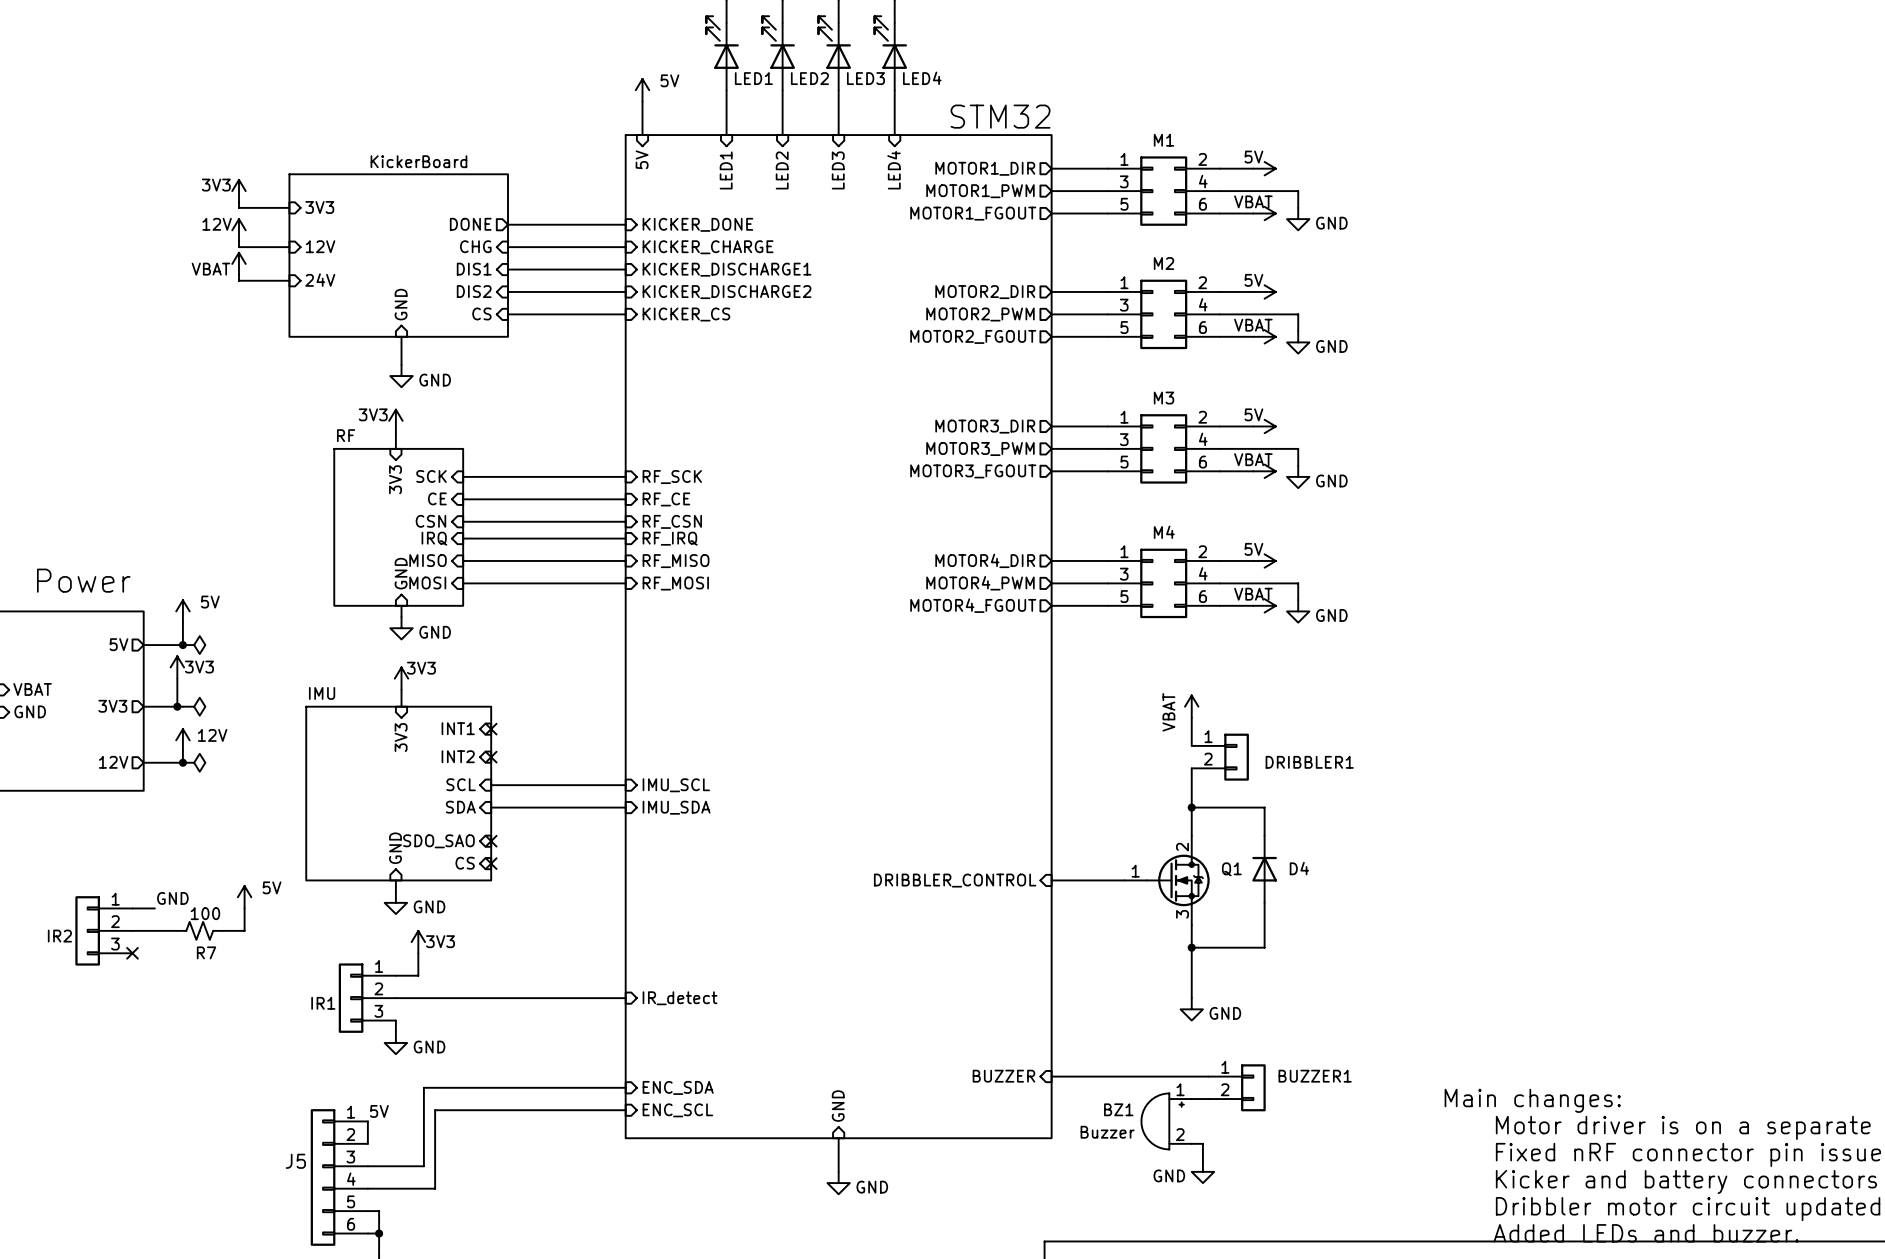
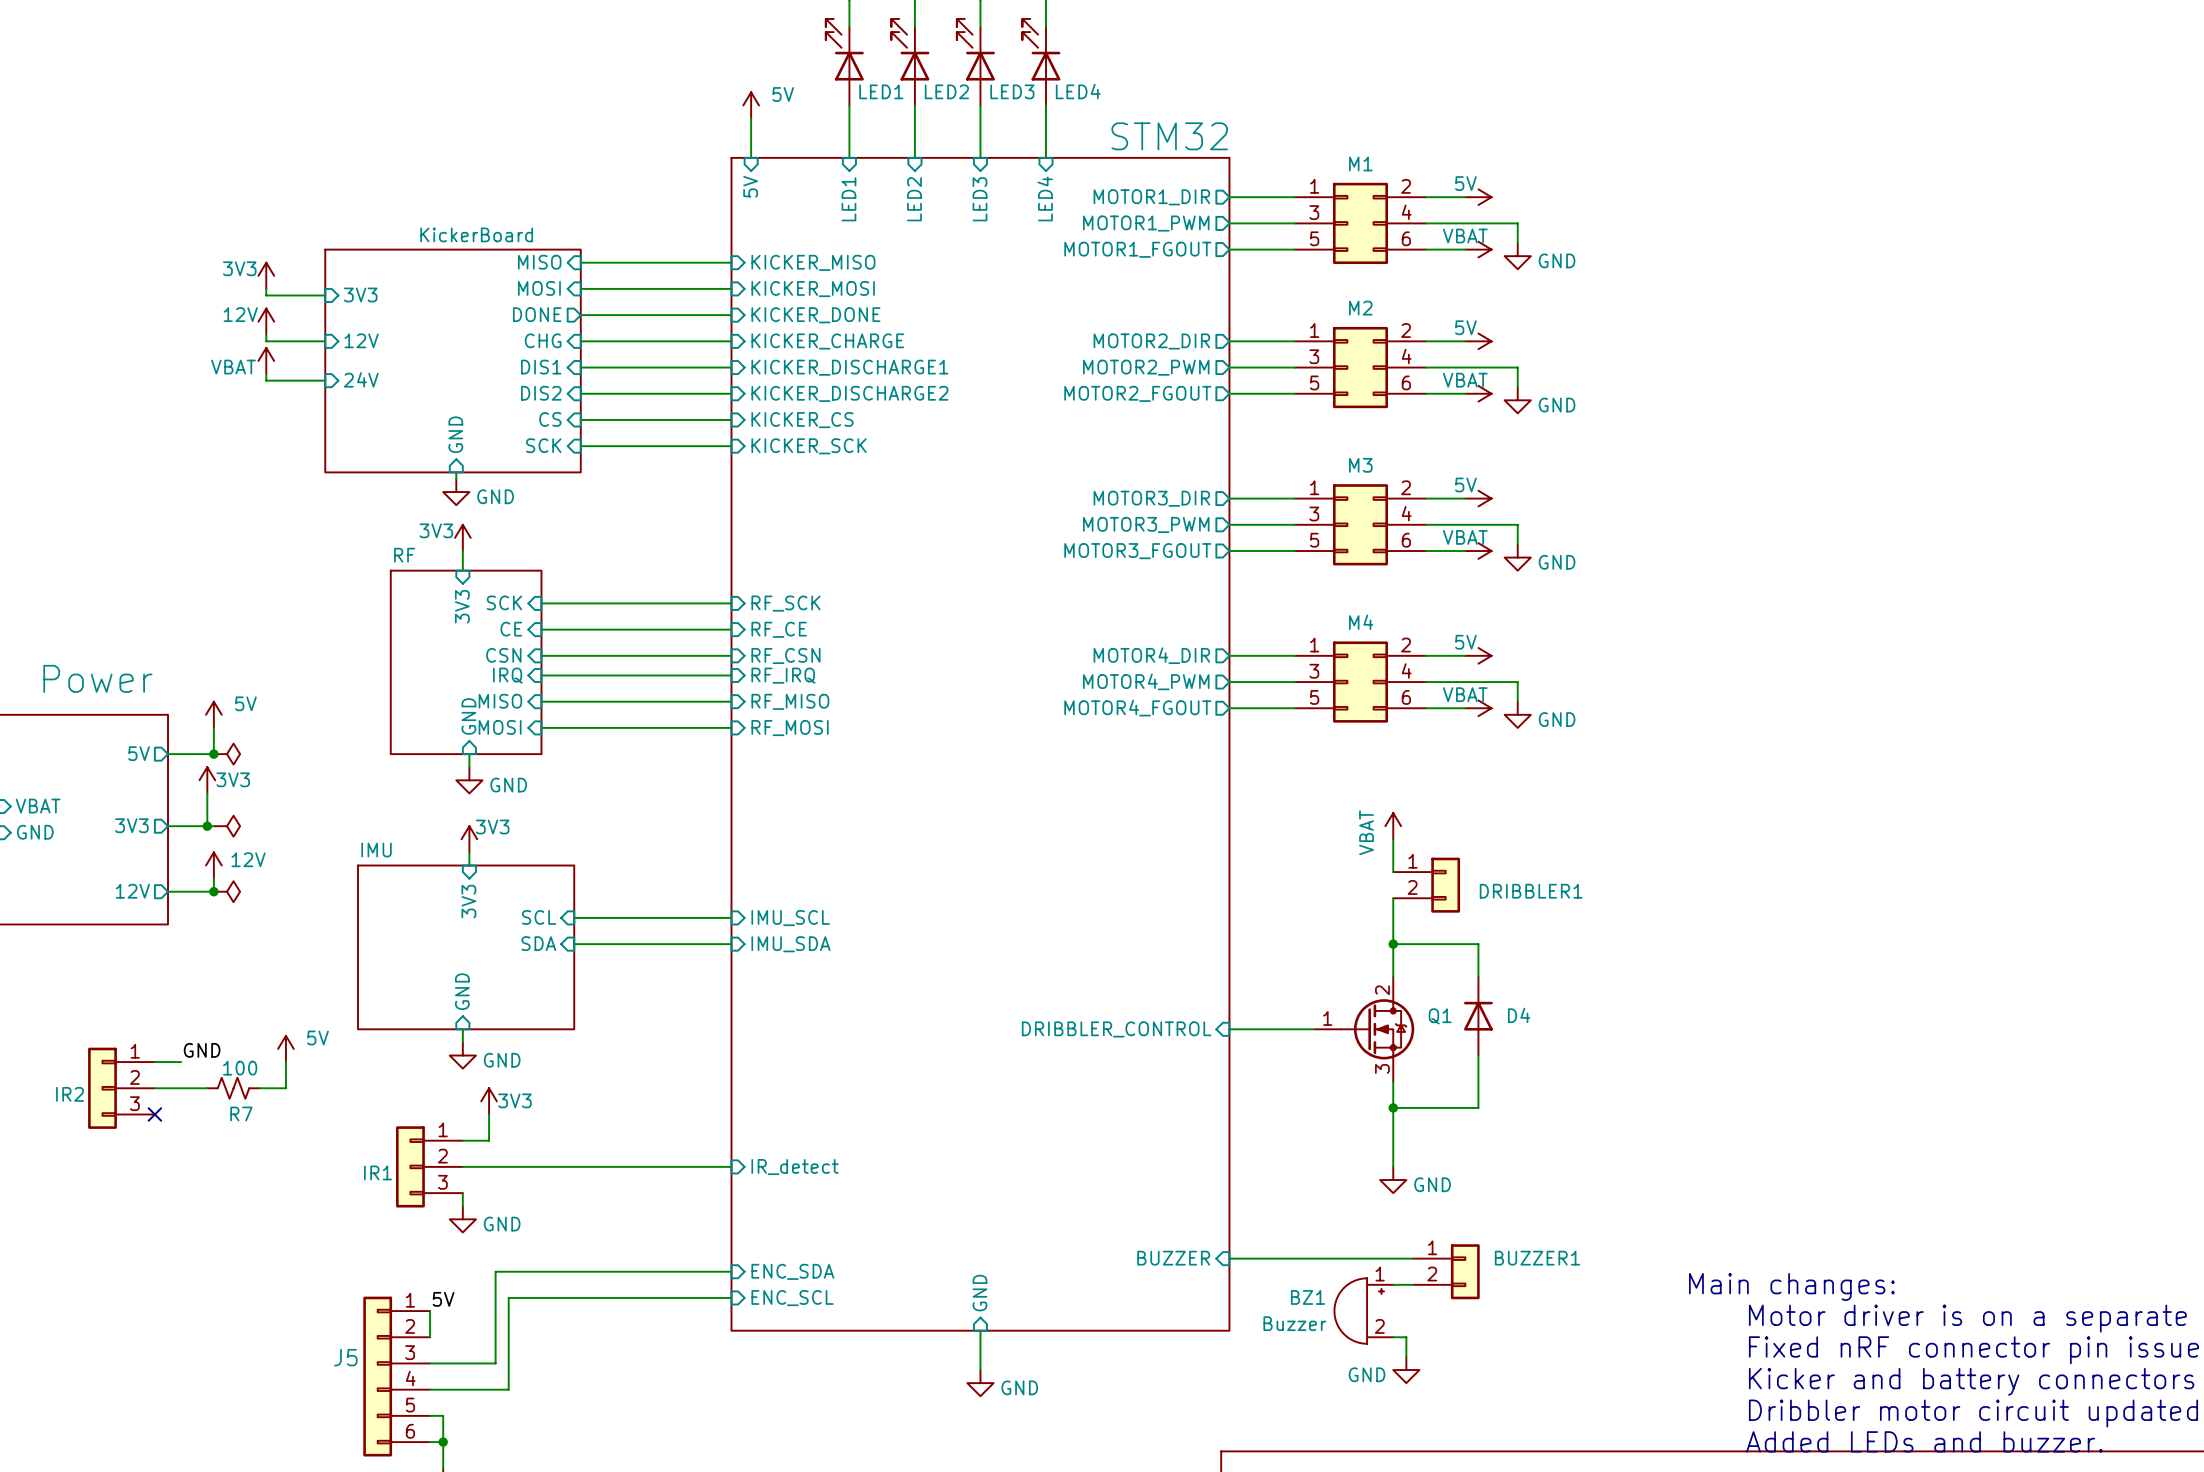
power symbol position: 3V3 (238, 191) -> 3V3 (266, 275)
wire: (238, 202) (238, 207) (289, 207) -> (266, 288) (266, 295) (325, 295)
sheet pin position: 3V3 (319, 207) -> 3V3 (360, 294)
sheet pin: none -> MISO (539, 262)
sheet pin position: DONE (470, 224) -> DONE (537, 314)
wire: none -> (580, 262) (593, 262)
sheet pin: KICKER_DONE (697, 224) -> KICKER_MISO (813, 262)
power symbol position: 12V (238, 230) -> 12V (266, 321)
wire: (238, 241) (238, 247) (289, 247) -> (266, 334) (266, 341) (325, 341)
sheet pin position: 12V (320, 246) -> 12V (361, 340)
sheet pin: none -> MOSI (539, 288)
sheet pin position: CHG (475, 246) -> CHG (543, 340)
wire: none -> (580, 288) (593, 288)
sheet pin: KICKER_CHARGE (708, 247) -> KICKER_MOSI (813, 289)
sheet KickerBoard: (398, 255) -> none
power symbol position: VBAT (238, 263) -> VBAT (266, 361)
sheet pin position: DIS1 (474, 269) -> DIS1 (541, 367)
wire: none -> (580, 315) (593, 315)
sheet pin: KICKER_DISCHARGE1 (727, 269) -> KICKER_DONE (815, 315)
wire: (238, 275) (238, 280) (289, 280) -> (266, 374) (266, 380) (325, 380)
sheet pin position: 24V (320, 280) -> 24V (361, 379)
sheet pin position: DIS2 (474, 291) -> DIS2 (541, 393)
wire: none -> (580, 341) (593, 341)
sheet pin: KICKER_DISCHARGE2 (727, 292) -> KICKER_CHARGE (827, 341)
sheet pin position: GND (401, 304) -> GND (455, 434)
sheet KickerBoard: none -> (453, 361)
sheet pin position: CS (481, 313) -> CS (550, 419)
wire: none -> (580, 367) (593, 367)
sheet pin: KICKER_CS (686, 314) -> KICKER_DISCHARGE1 (849, 367)
wire: (401, 336) (401, 364) -> none
wire: none -> (580, 393) (731, 393)
sheet pin: none -> KICKER_DISCHARGE2 (849, 393)
wire: none -> (580, 419) (731, 419)
sheet pin: none -> KICKER_CS (802, 420)
power symbol: GND (401, 376) -> none
sheet pin: none -> SCK (543, 445)
wire: none -> (580, 446) (731, 446)
sheet pin: none -> KICKER_SCK (809, 446)
wire: none -> (456, 472) (456, 478)
power symbol: 3V3 (395, 420) -> GND (456, 492)
wire: (395, 432) (395, 448) -> (462, 551) (462, 570)
power symbol: none -> 3V3 (462, 537)
sheet pin position: SCK (431, 476) -> SCK (504, 602)
wire: (463, 476) (625, 476) -> (541, 603) (731, 603)
sheet pin position: RF_SCK (672, 477) -> RF_SCK (785, 603)
sheet pin position: 3V3 (395, 479) -> 3V3 (462, 606)
sheet pin: CE (437, 498) -> none
wire: (463, 499) (625, 499) -> (541, 701) (731, 701)
sheet pin: RF_CE (666, 499) -> none
sheet pin: CSN (430, 521) -> none
wire: (463, 521) (625, 521) -> (541, 675) (731, 675)
sheet pin: RF_CSN (672, 521) -> none
sheet RF position: (398, 527) -> (466, 662)
sheet pin: IRQ (434, 538) -> CE (511, 629)
sheet pin: RF_IRQ (670, 538) -> RF_CE (779, 629)
sheet pin: MISO (428, 560) -> CSN (503, 655)
sheet pin: RF_MISO (676, 561) -> RF_CSN (785, 655)
sheet pin position: GND (401, 573) -> GND (468, 716)
sheet pin: none -> IRQ (507, 675)
sheet pin: none -> RF_IRQ (783, 675)
sheet pin position: MOSI (427, 582) -> MOSI (500, 727)
wire: (463, 583) (625, 583) -> (541, 727) (731, 727)
sheet pin position: RF_MOSI (675, 583) -> RF_MOSI (790, 728)
sheet pin: none -> MISO (500, 701)
sheet pin: none -> RF_MISO (790, 701)
wire: (401, 605) (401, 617) -> (469, 754) (469, 767)
power symbol position: GND (401, 628) -> GND (469, 780)
power symbol position: 3V3 (401, 678) -> 3V3 (469, 839)
wire: (401, 689) (401, 706) -> none
sheet pin: INT1 (458, 728) -> none
wire: none -> (469, 852) (469, 865)
no-connect mark: (491, 729) -> none
sheet pin position: 3V3 (401, 737) -> 3V3 (468, 901)
sheet pin: INT2 (458, 756) -> none
no-connect mark: (491, 757) -> none
sheet IMU: (398, 793) -> none
sheet IMU: none -> (466, 947)
sheet pin: SDO_SAO (438, 841) -> none
no-connect mark: (491, 841) -> none
sheet pin: CS (465, 863) -> none
no-connect mark: (491, 863) -> none

